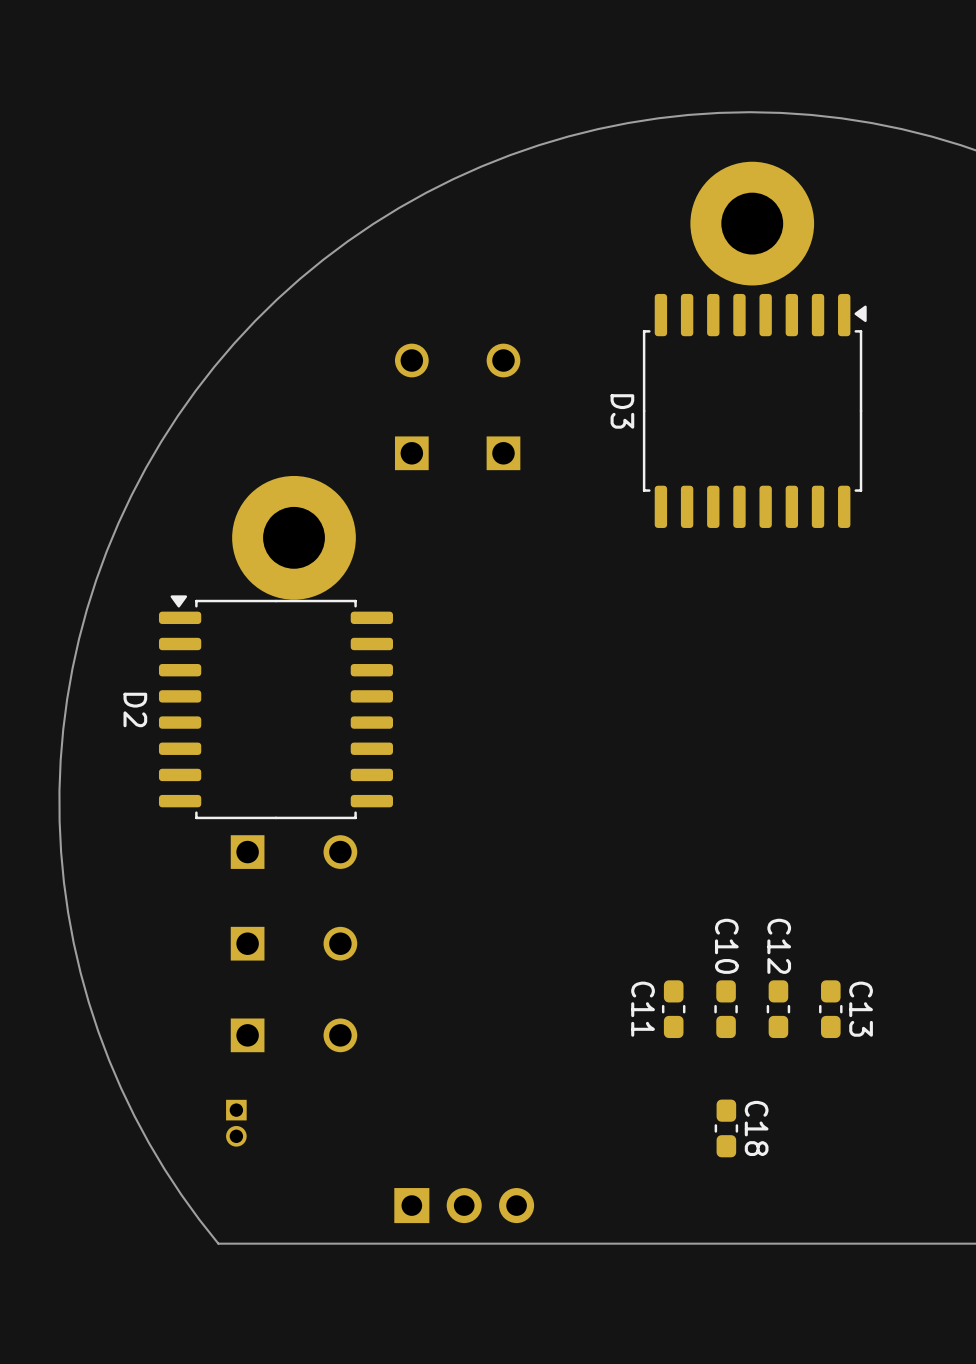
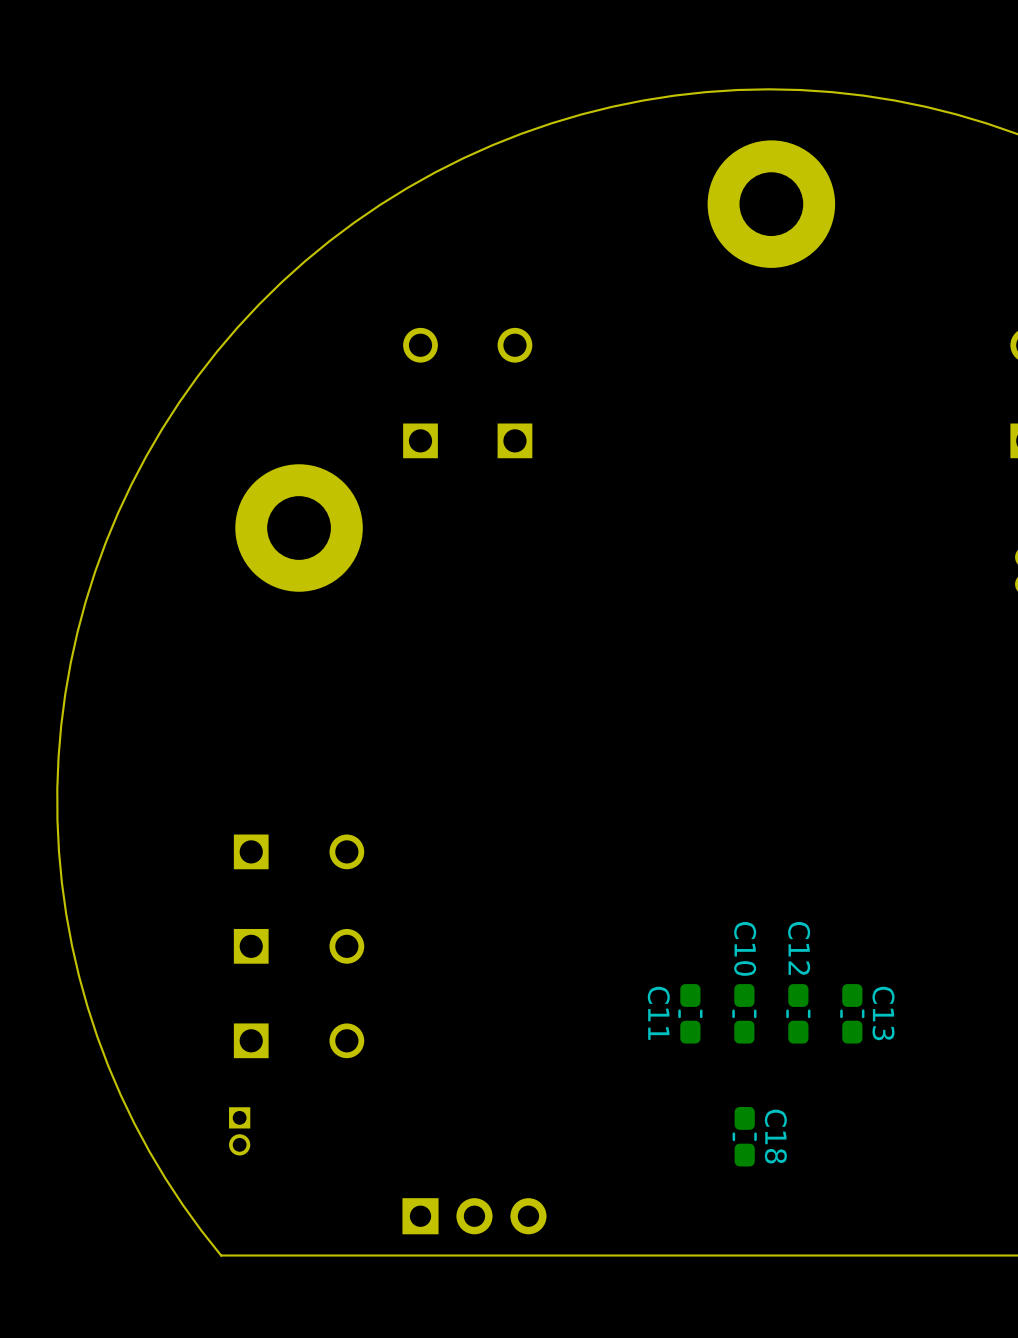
D3: (754, 410) -> none
D2: (275, 707) -> none

